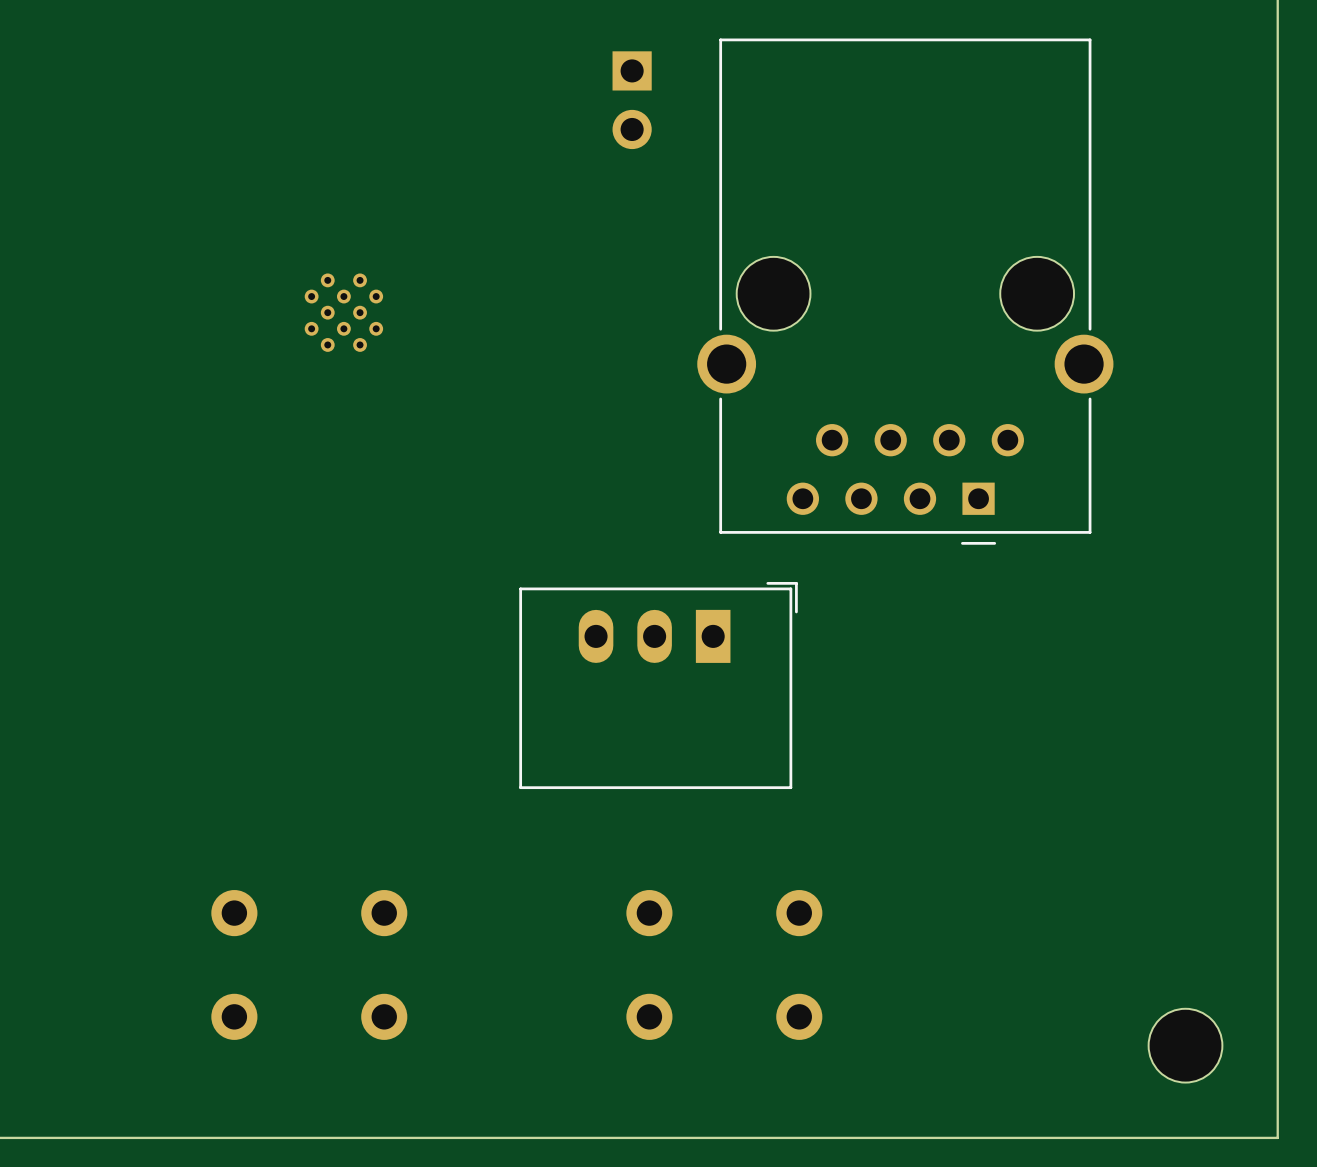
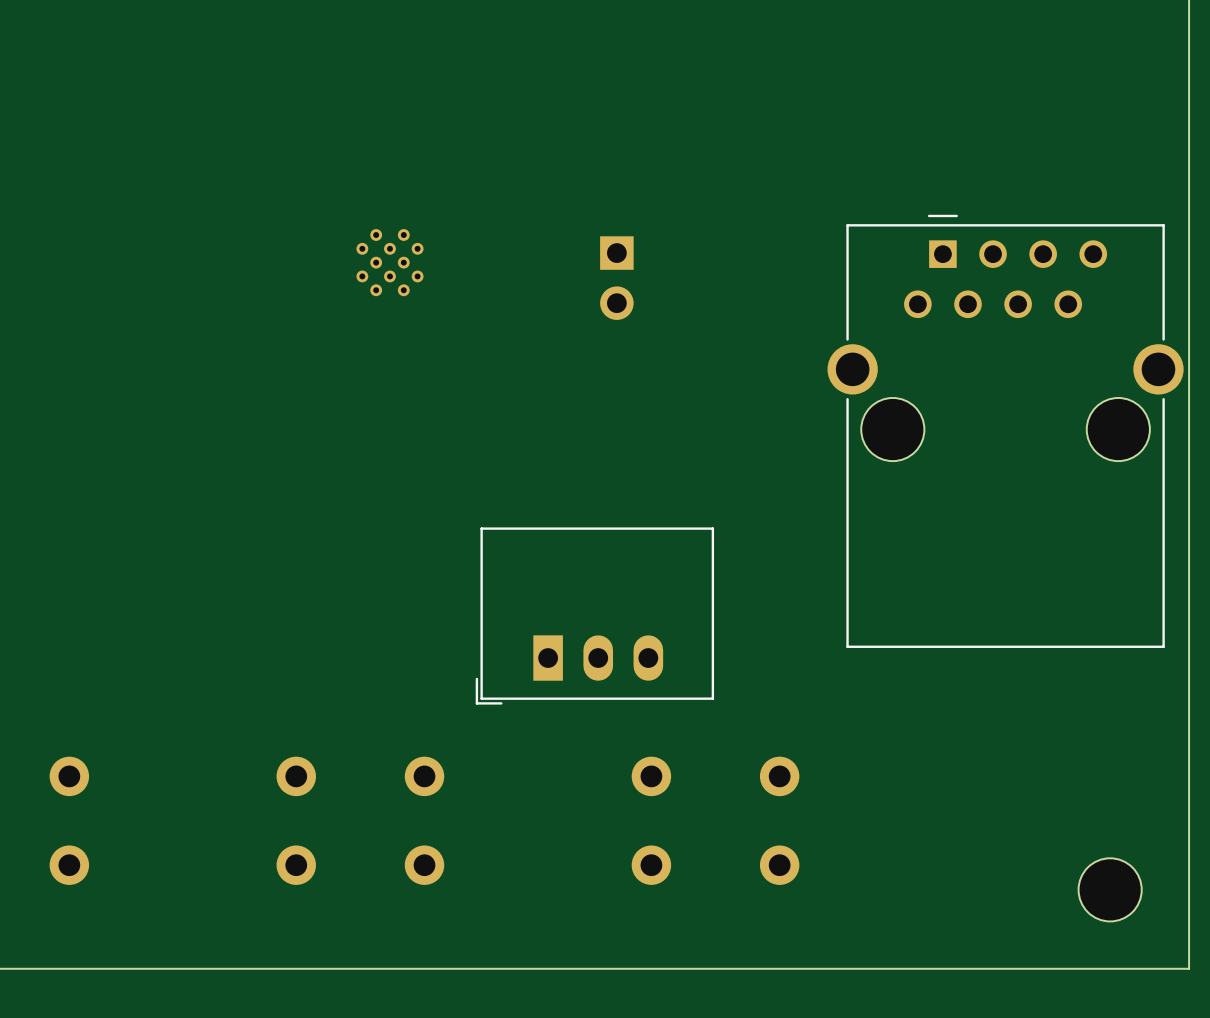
part position: (632, 100) -> (616, 278)
part rotation: 0° (905, 291) -> 180° (1005, 431)
part rotation: 0° (658, 685) -> 180° (594, 616)

